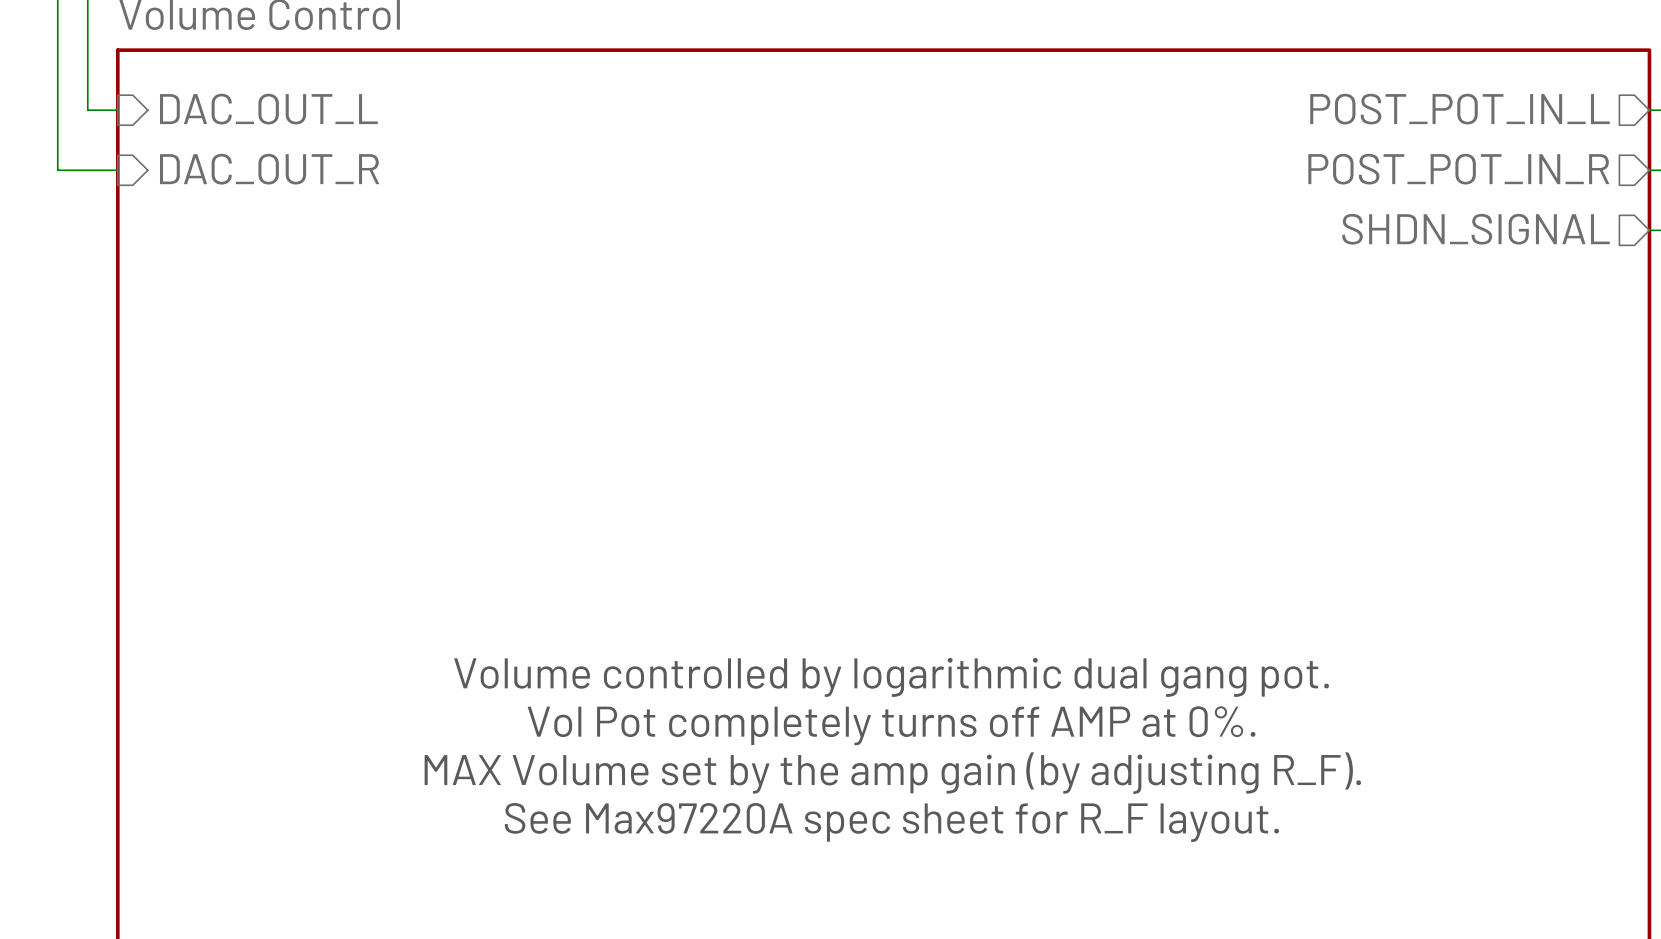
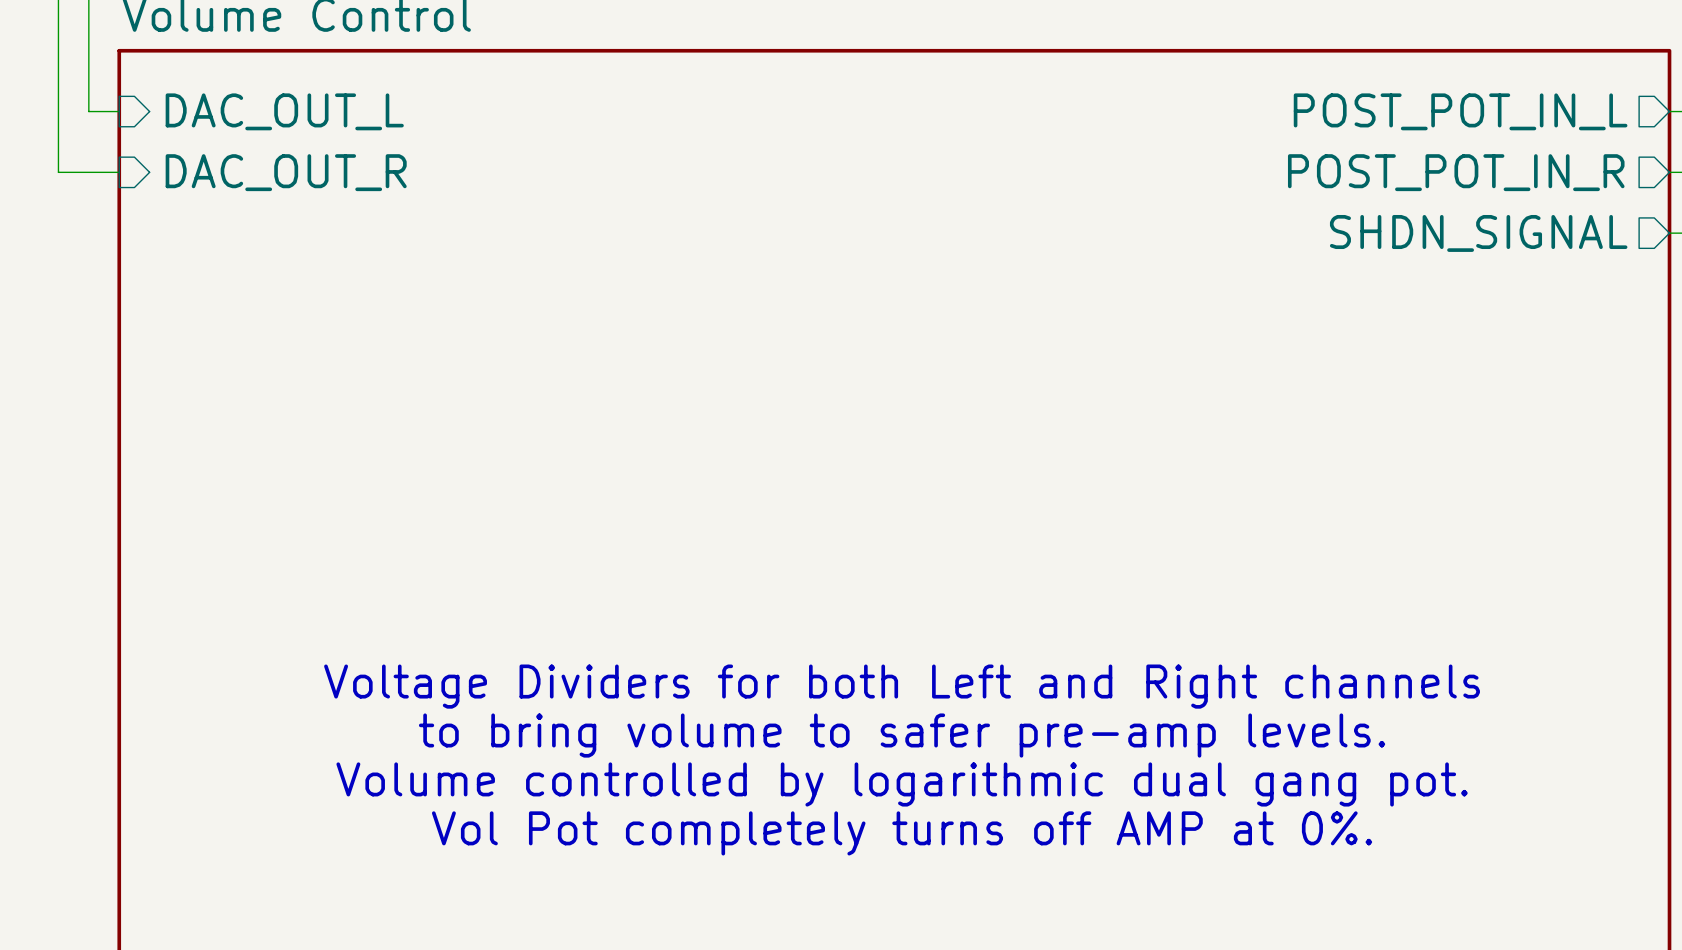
text: Volume controlled by logarithmic dual gang pot. (891, 677) -> Voltage Dividers for both Left and Right channels (902, 686)
text: Vol Pot completely turns off AMP at 0%. (891, 725) -> to bring volume to safer pre-amp levels. (902, 735)
text: MAX Volume set by the amp gain (by adjusting R_F). (892, 773) -> Volume controlled by logarithmic dual gang pot. (902, 784)
text: See Max97220A spec sheet for R_F layout. (891, 822) -> Vol Pot completely turns off AMP at 0%. (902, 833)

